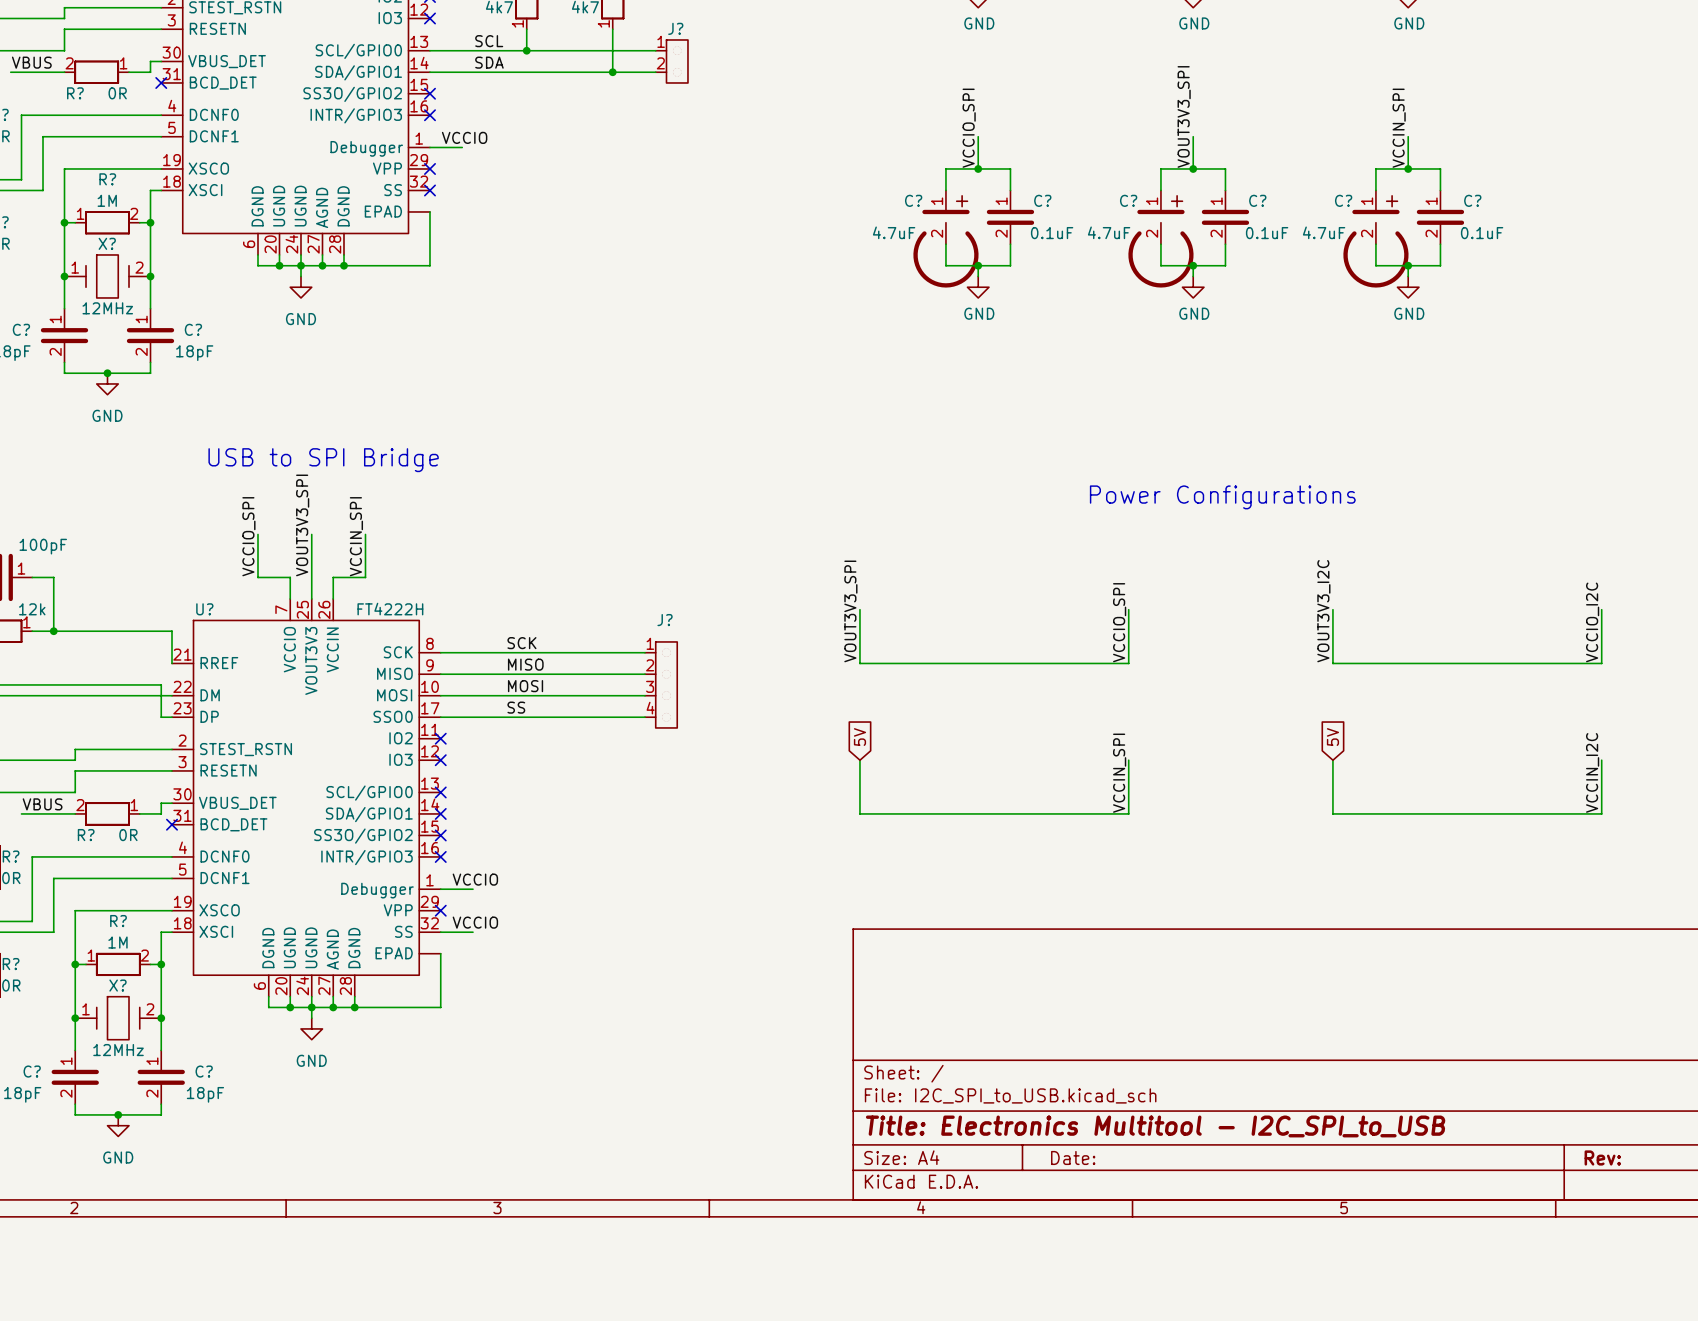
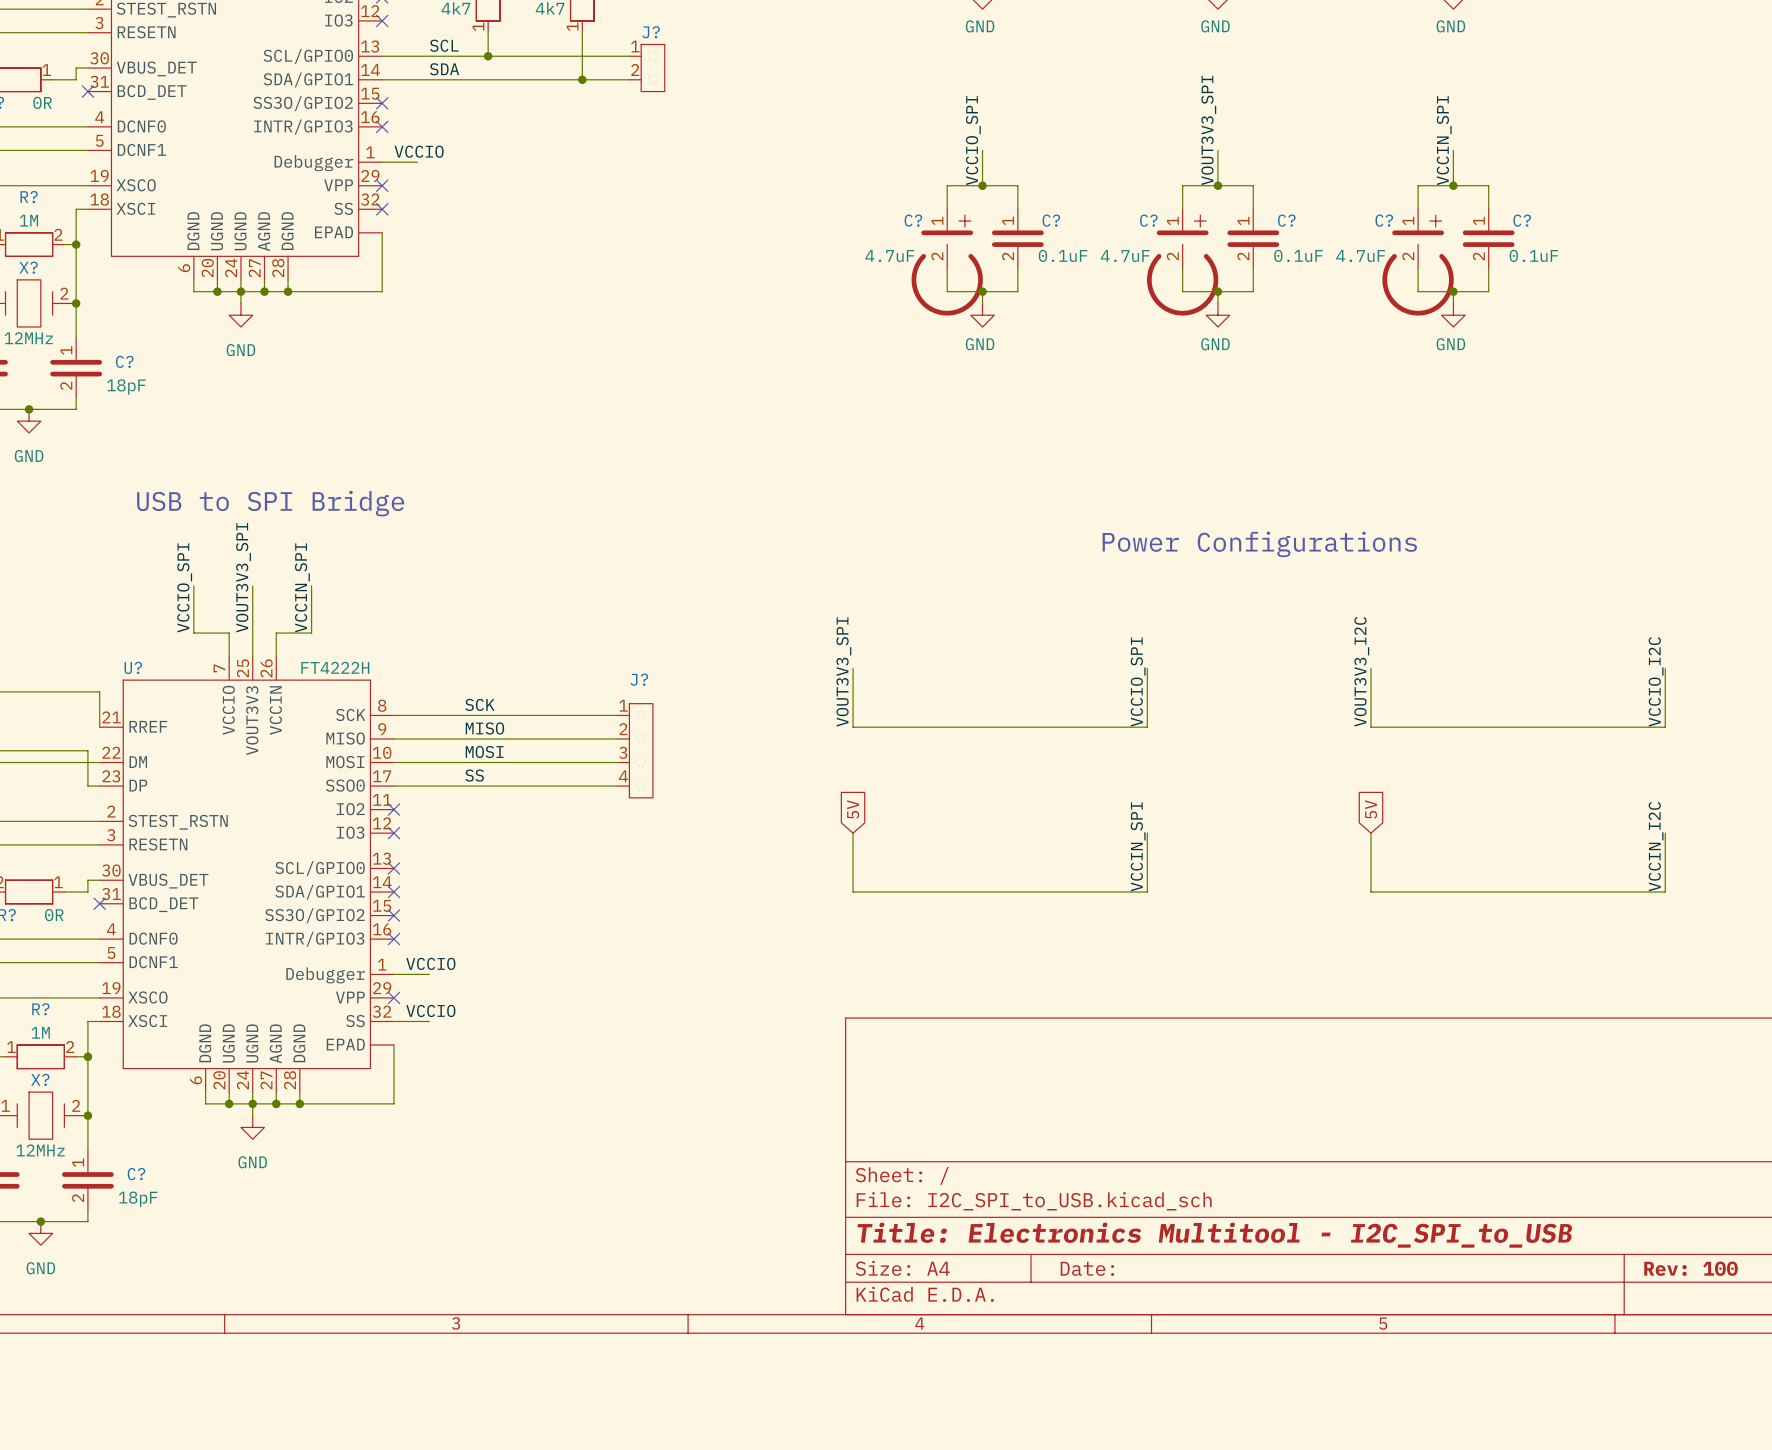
title block: Rev: (1602, 1157) -> Rev: 100 (1691, 1268)

